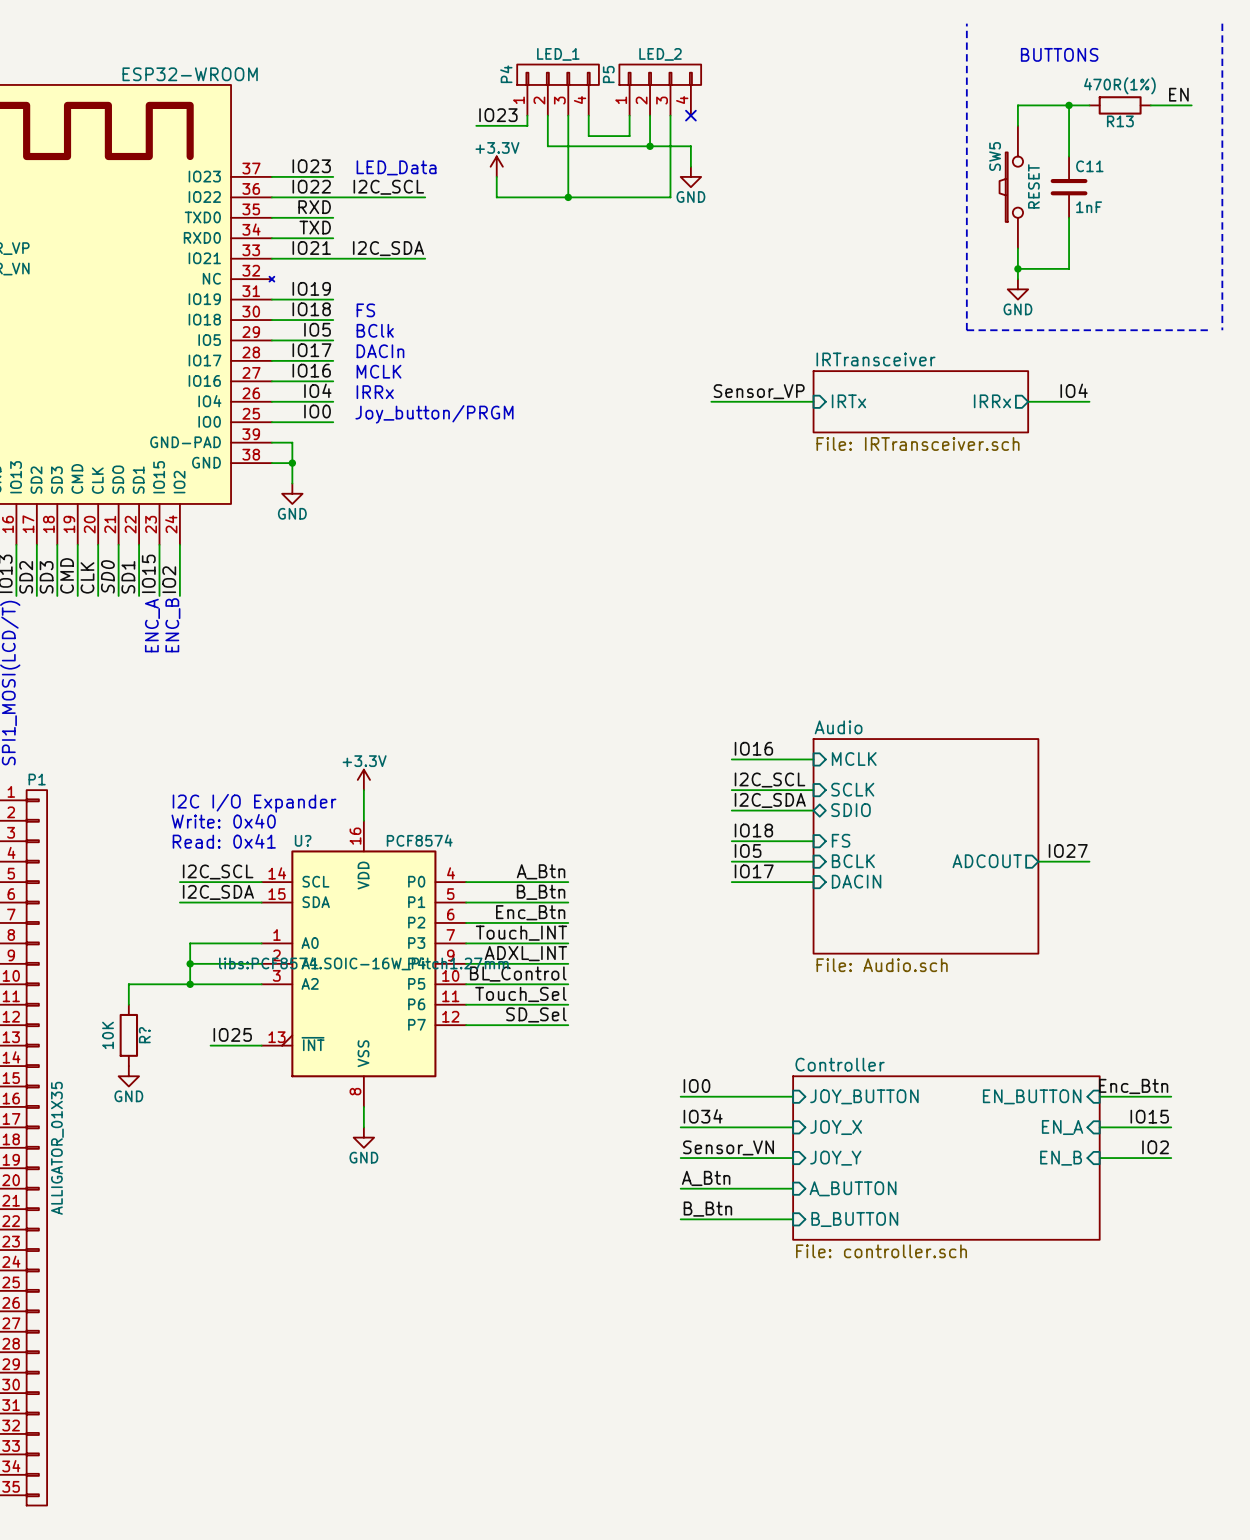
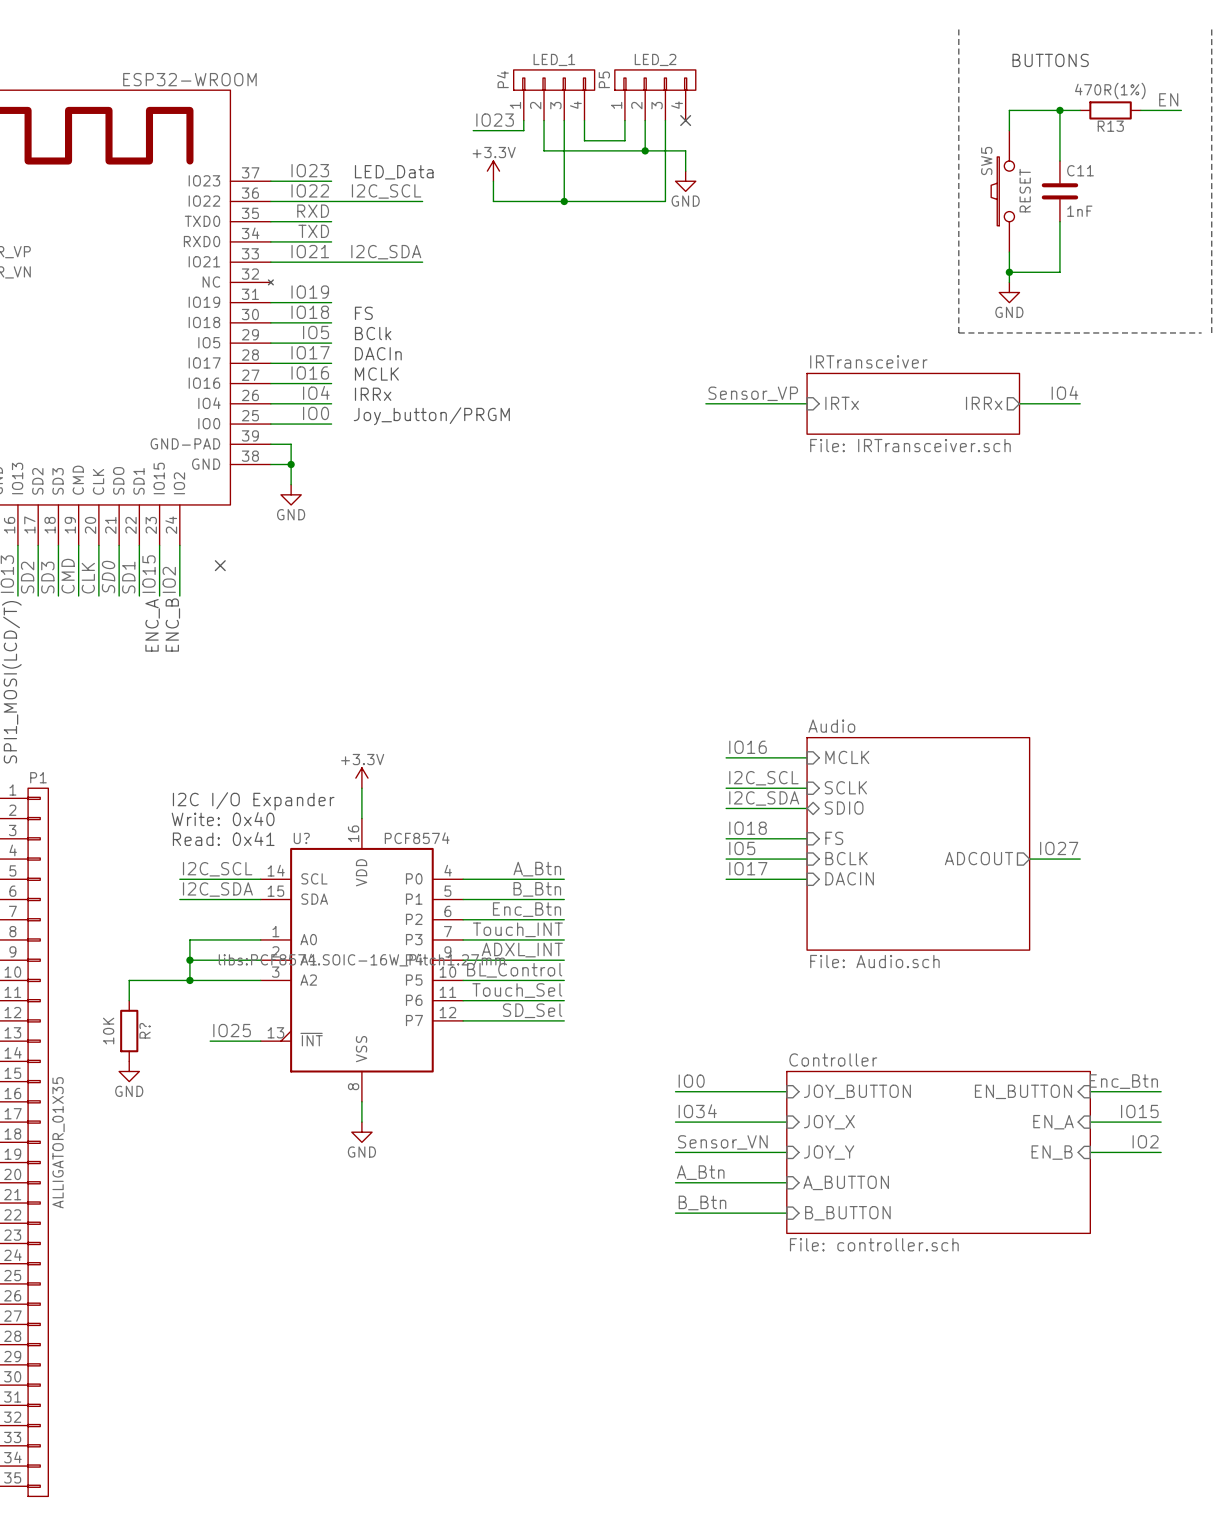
no-connect mark: none -> (220, 565)

